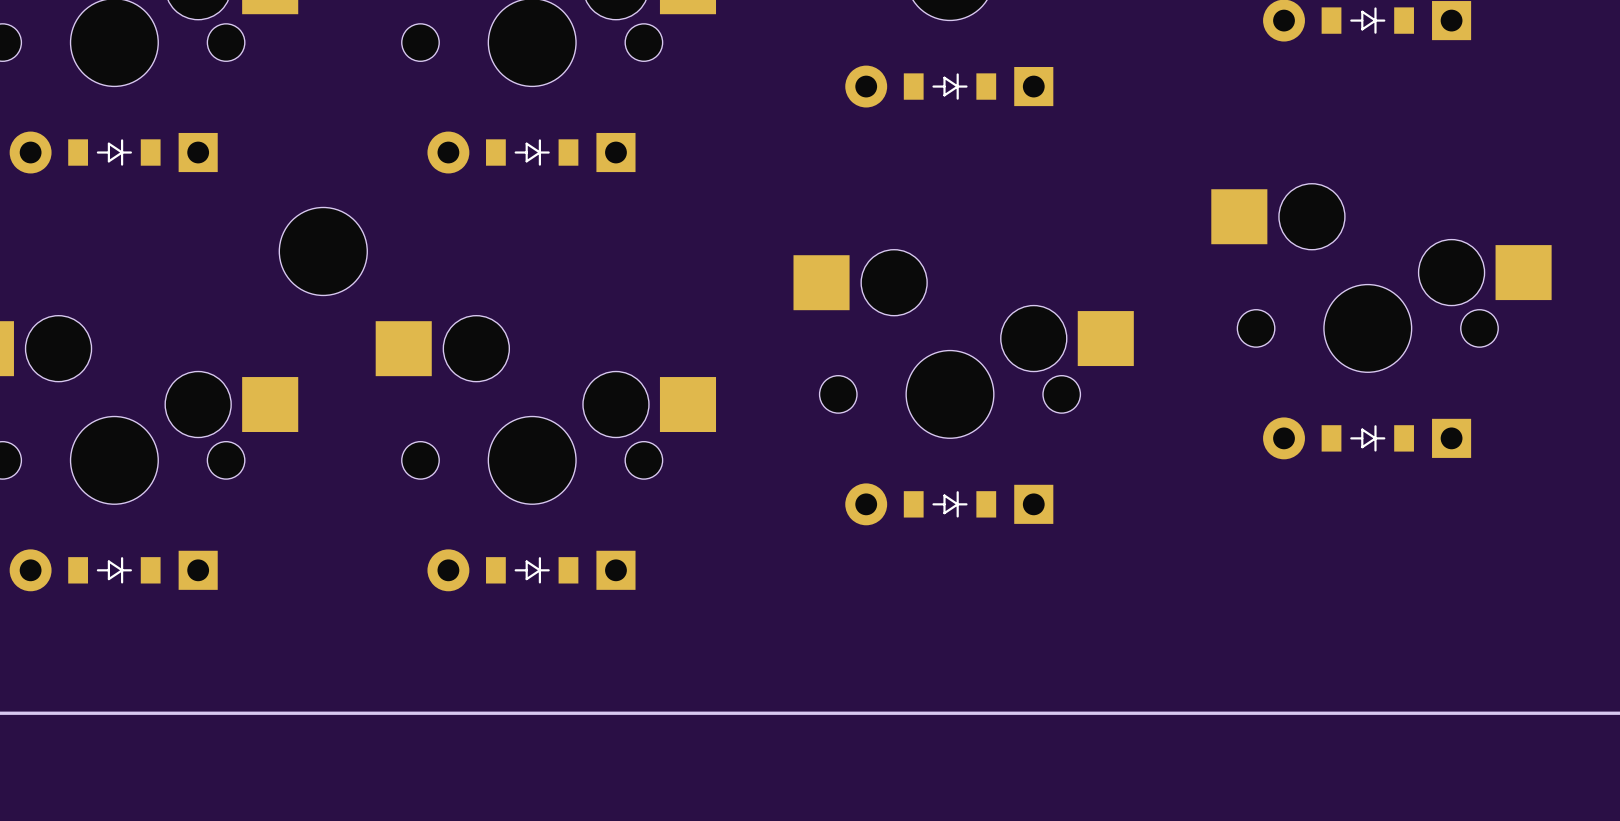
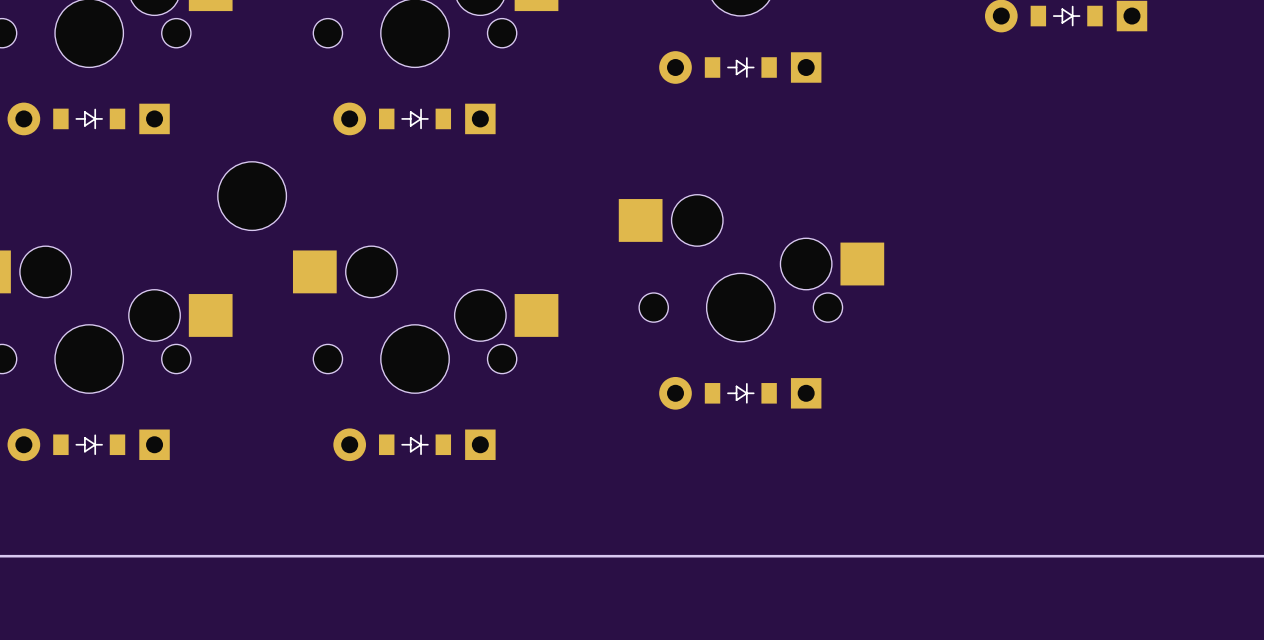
part: (1381, 278) -> none
part: (1367, 438) -> none

